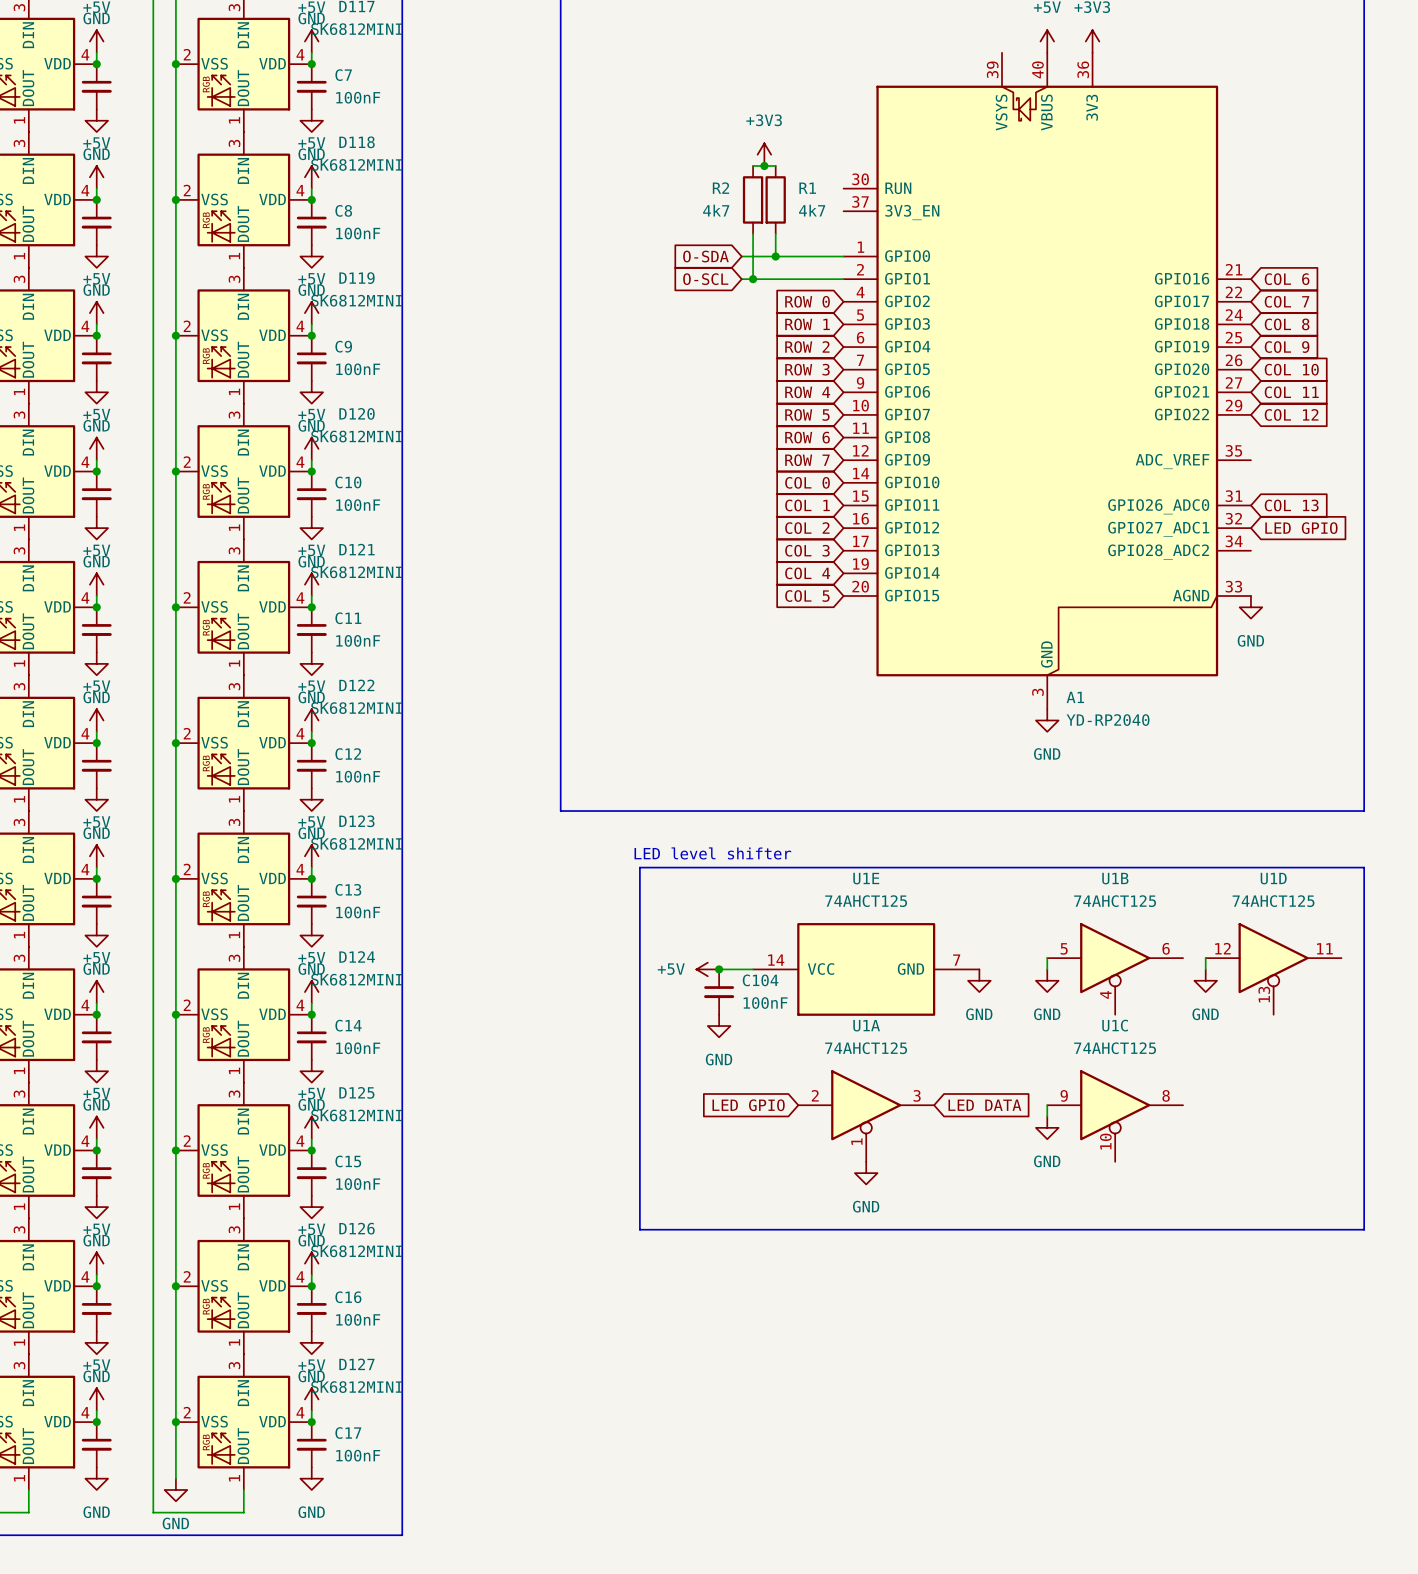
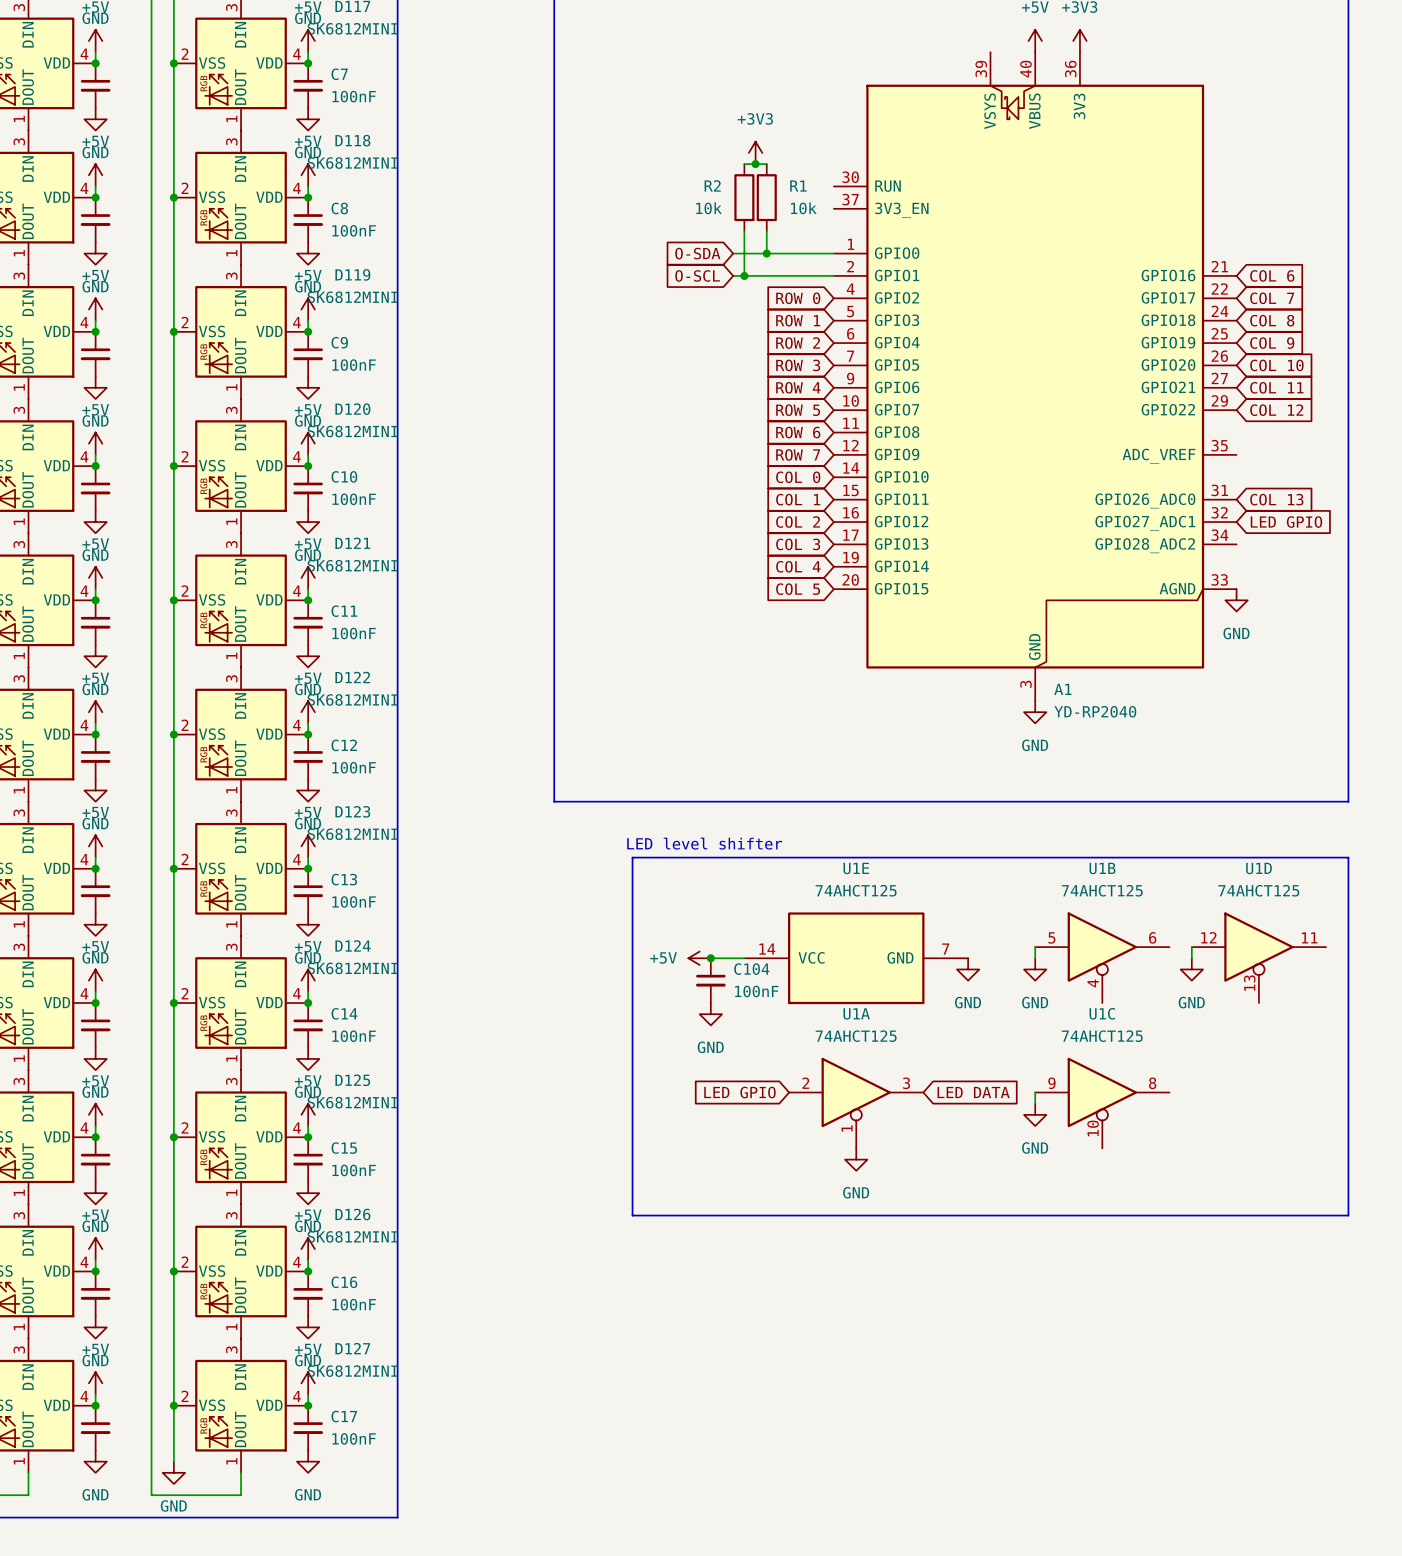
R2 value: 4k7 (716, 210) -> 10k (708, 208)
R1 value: 4k7 (812, 210) -> 10k (803, 208)

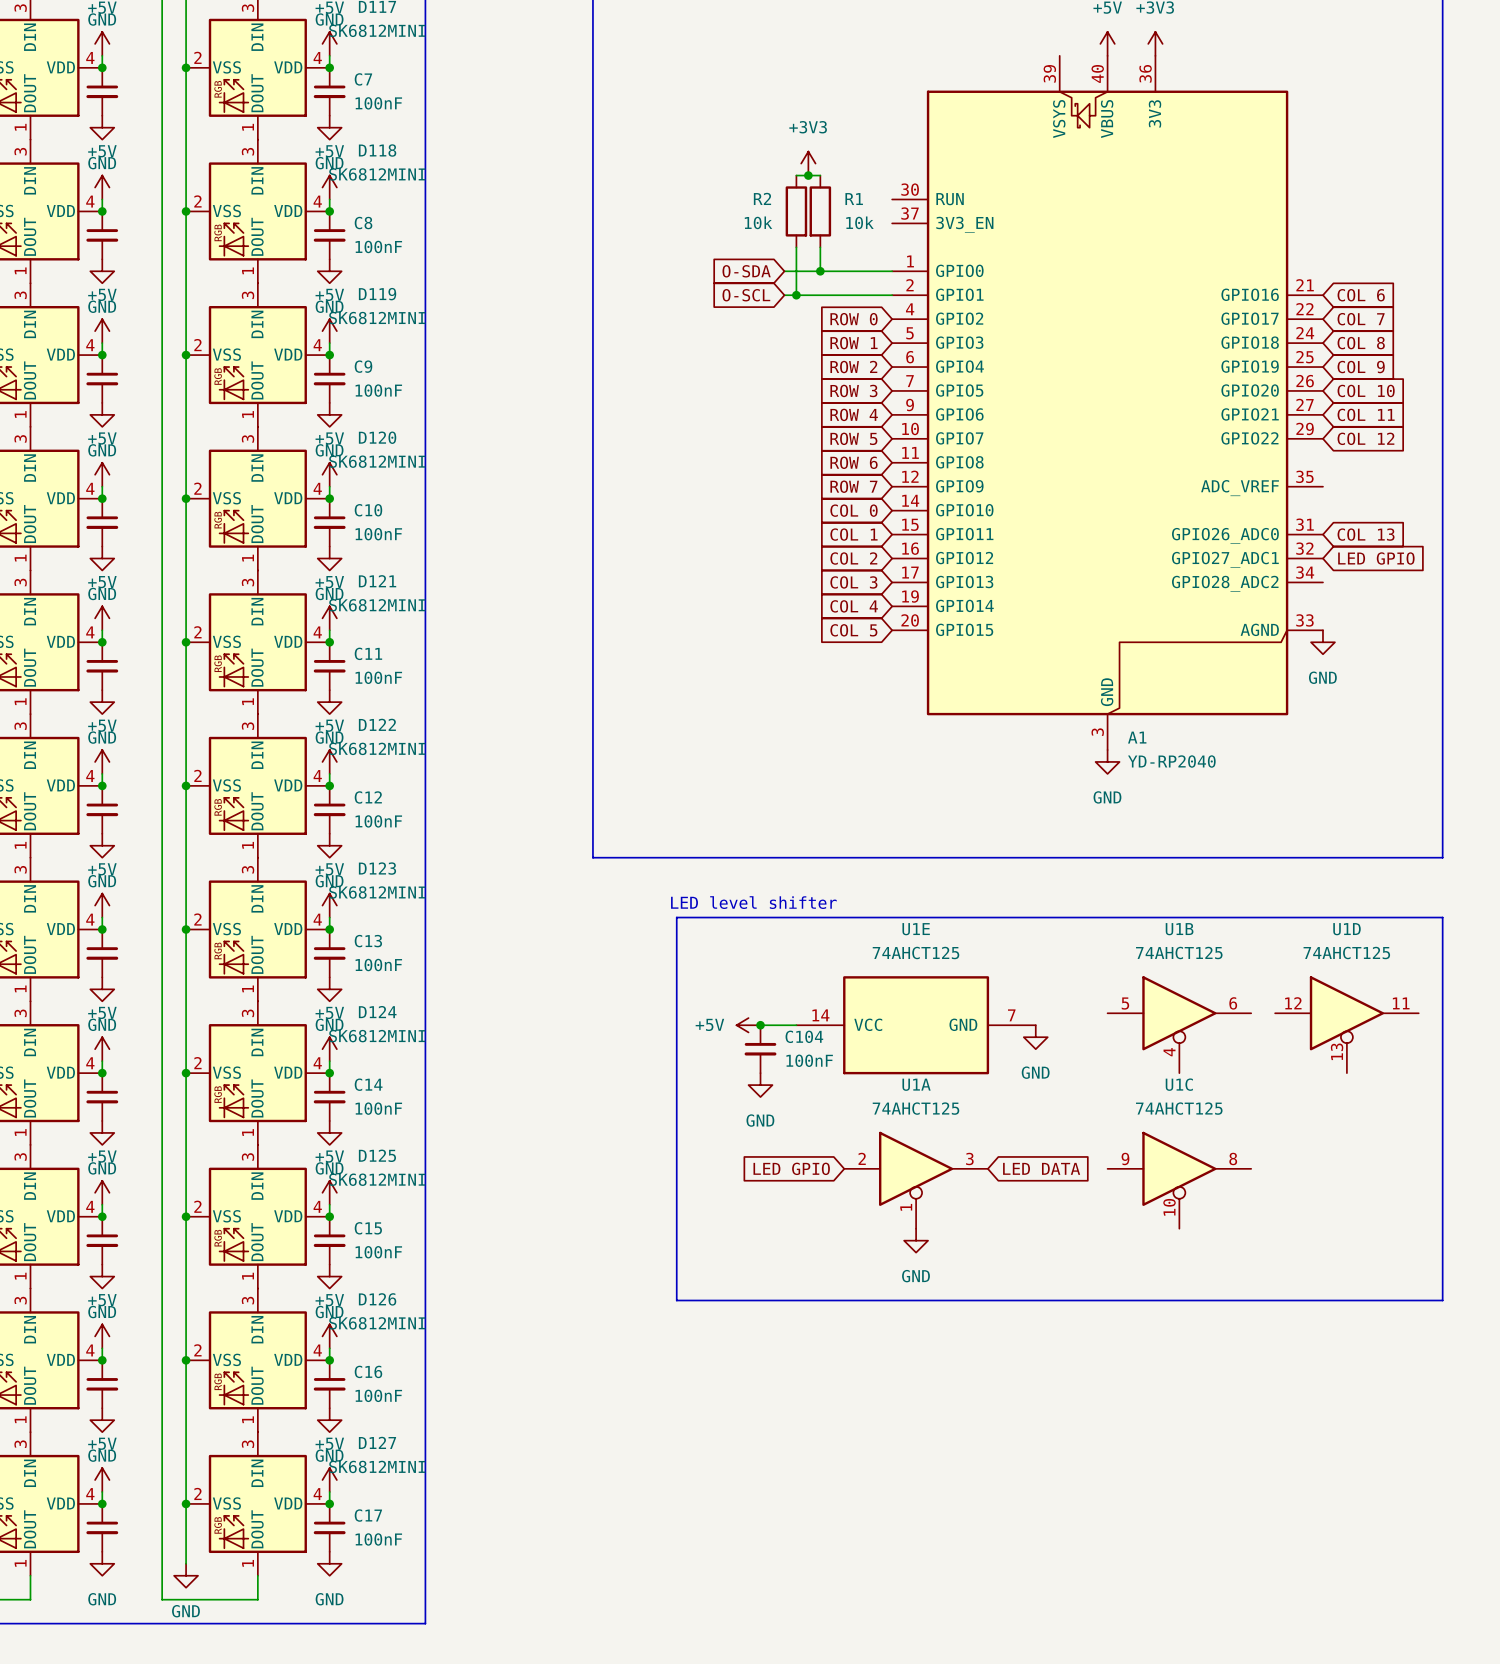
wire: (1035, 947) (1035, 958) -> none
wire: (1191, 947) (1191, 958) -> none
power symbol: GND (1035, 969) -> none
power symbol: GND (1191, 969) -> none
wire: (1035, 1092) (1035, 1103) -> none
power symbol: GND (1035, 1114) -> none

